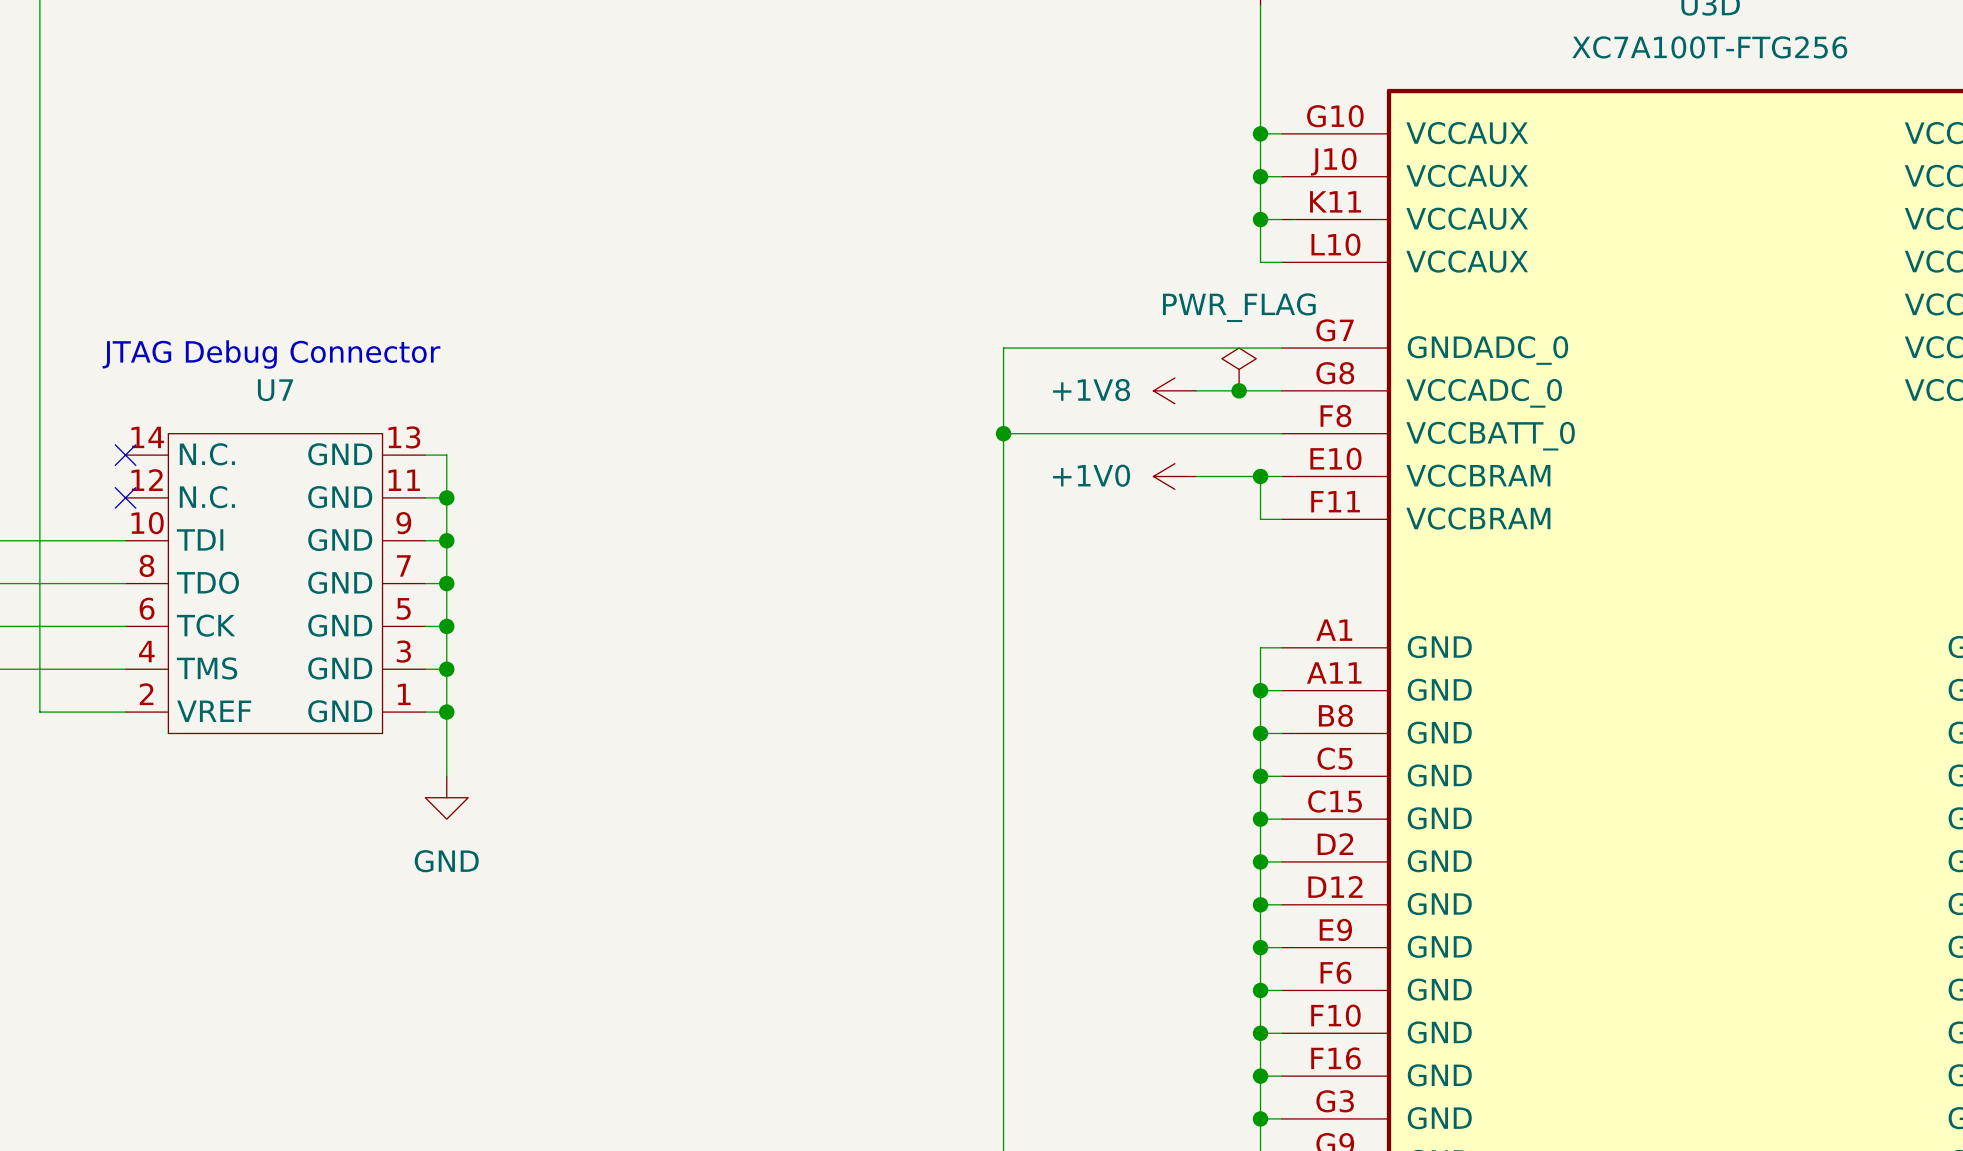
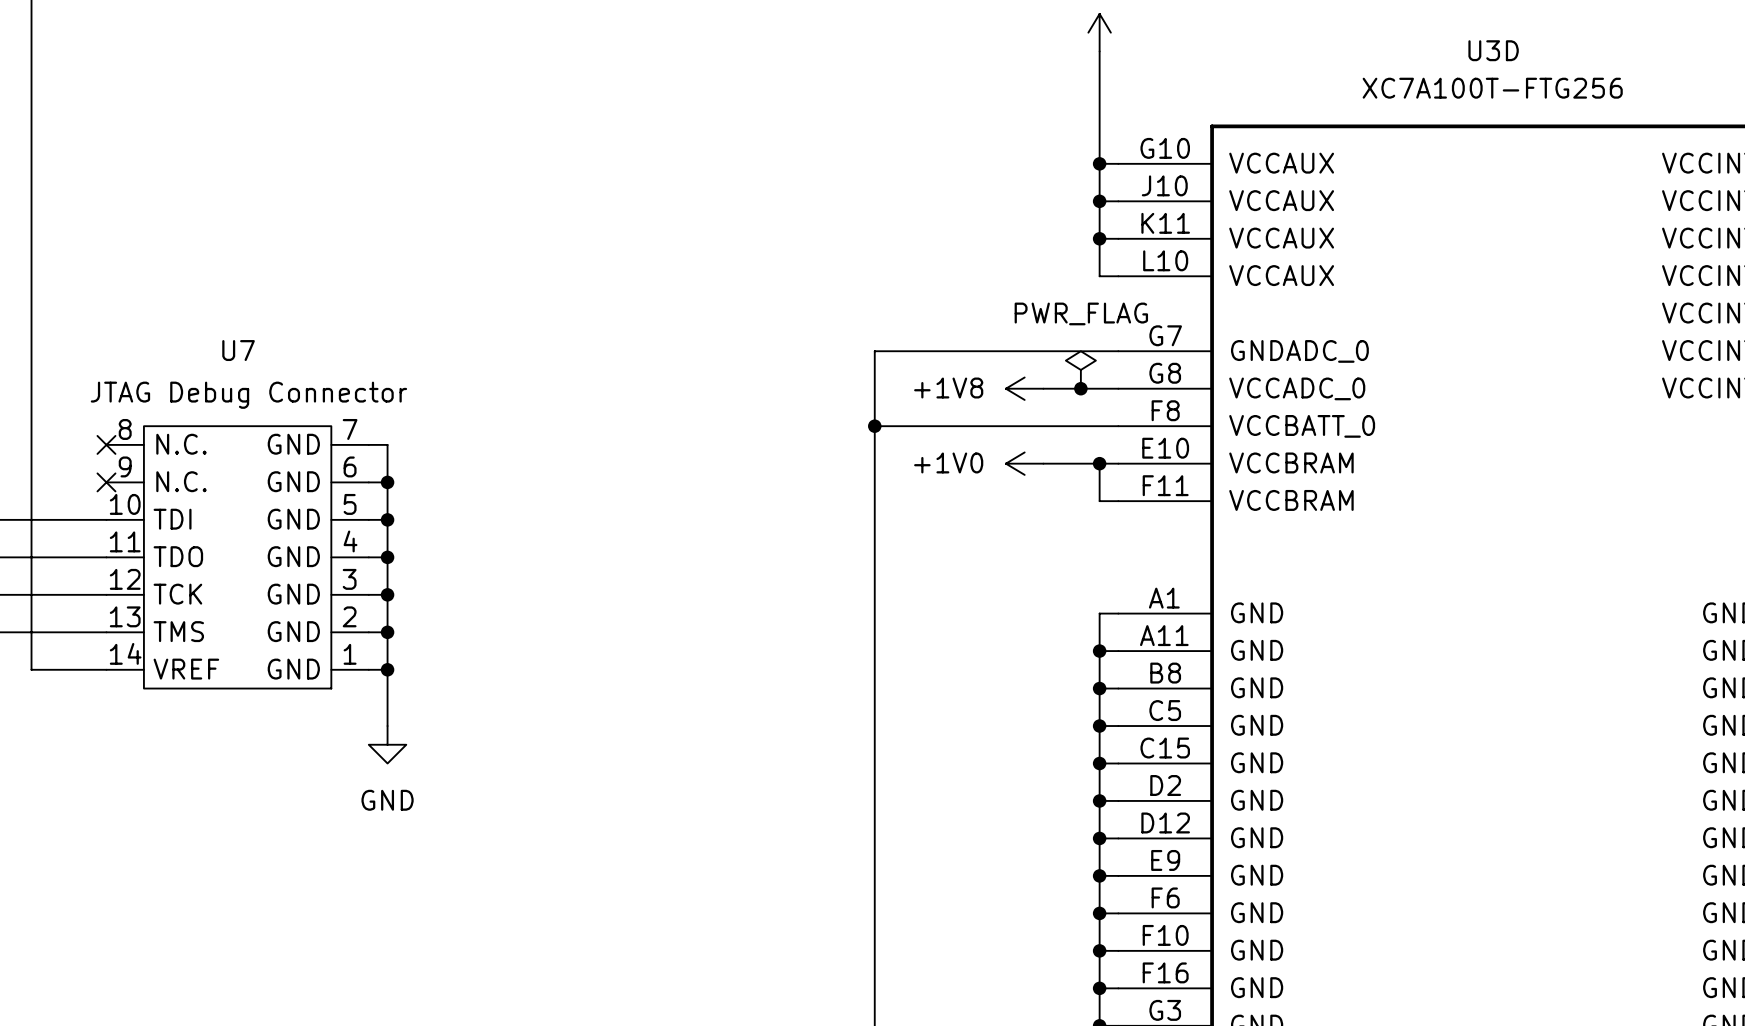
text position: JTAG Debug Connector (271, 354) -> JTAG Debug Connector (248, 395)
U7 name position: U7 (275, 390) -> U7 (238, 350)
U7 symbol: [125, 433, 426, 734] -> [106, 426, 369, 689]

